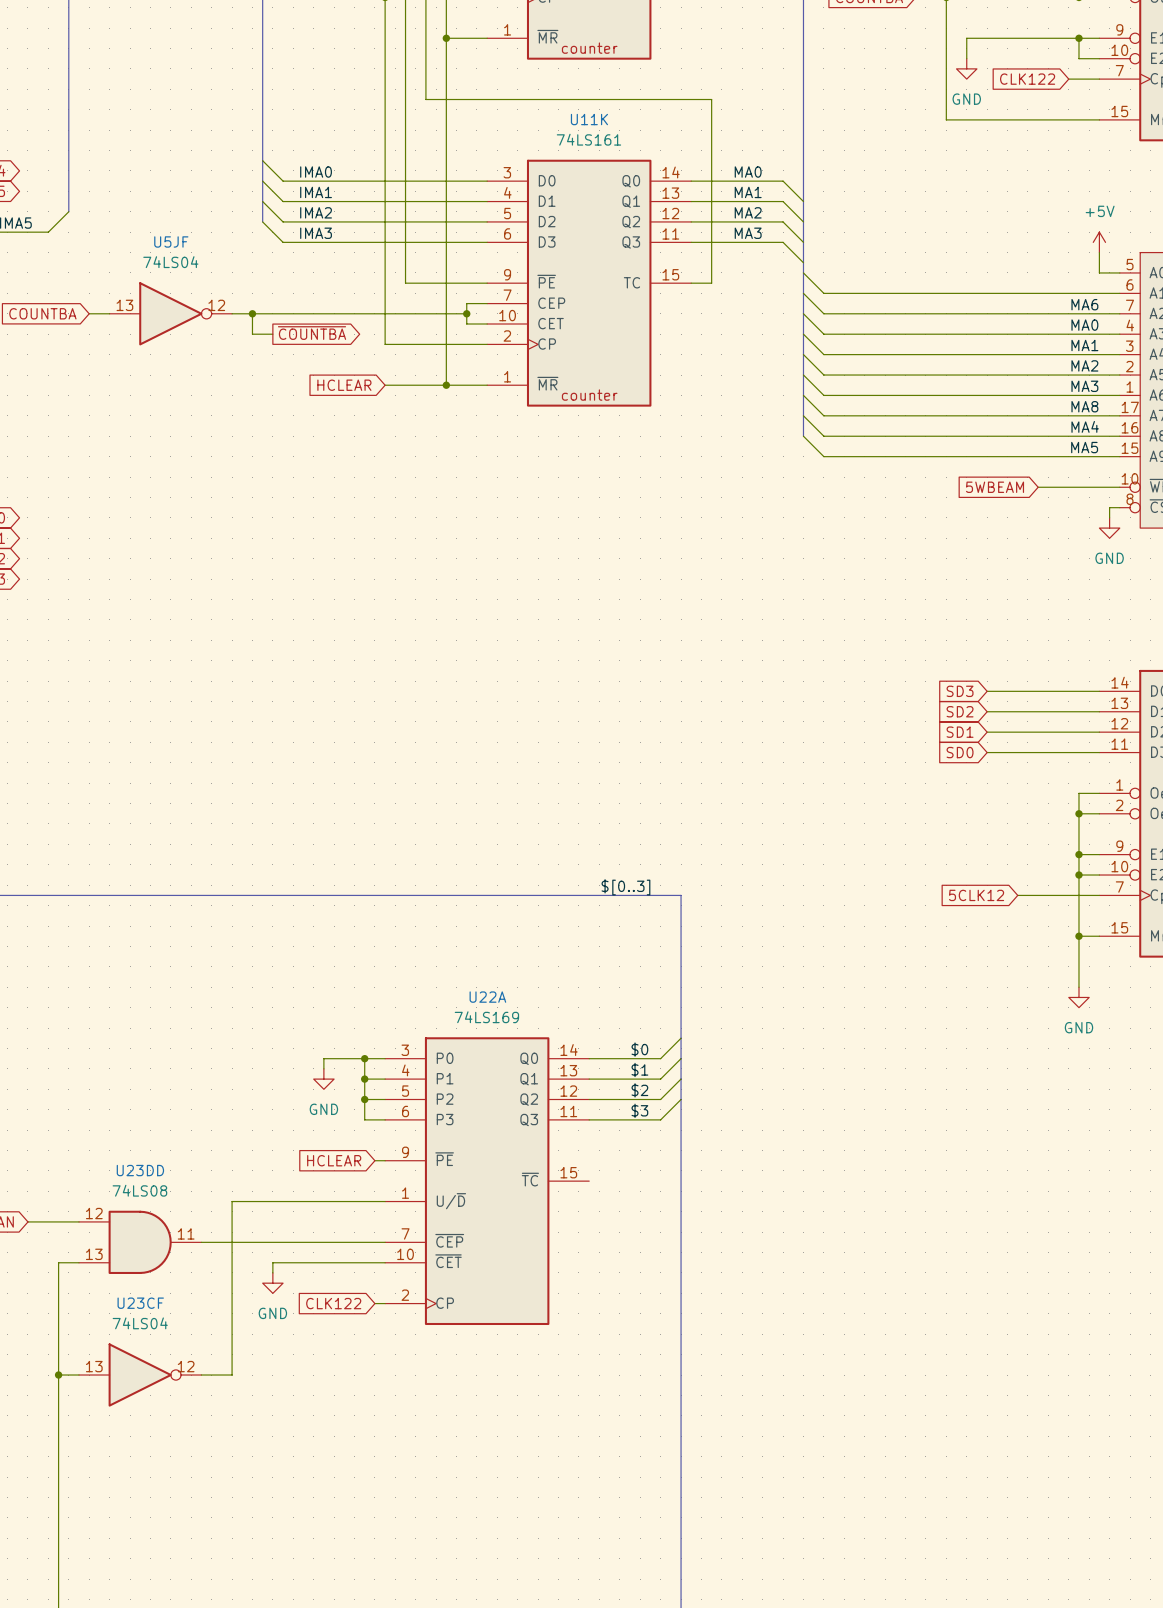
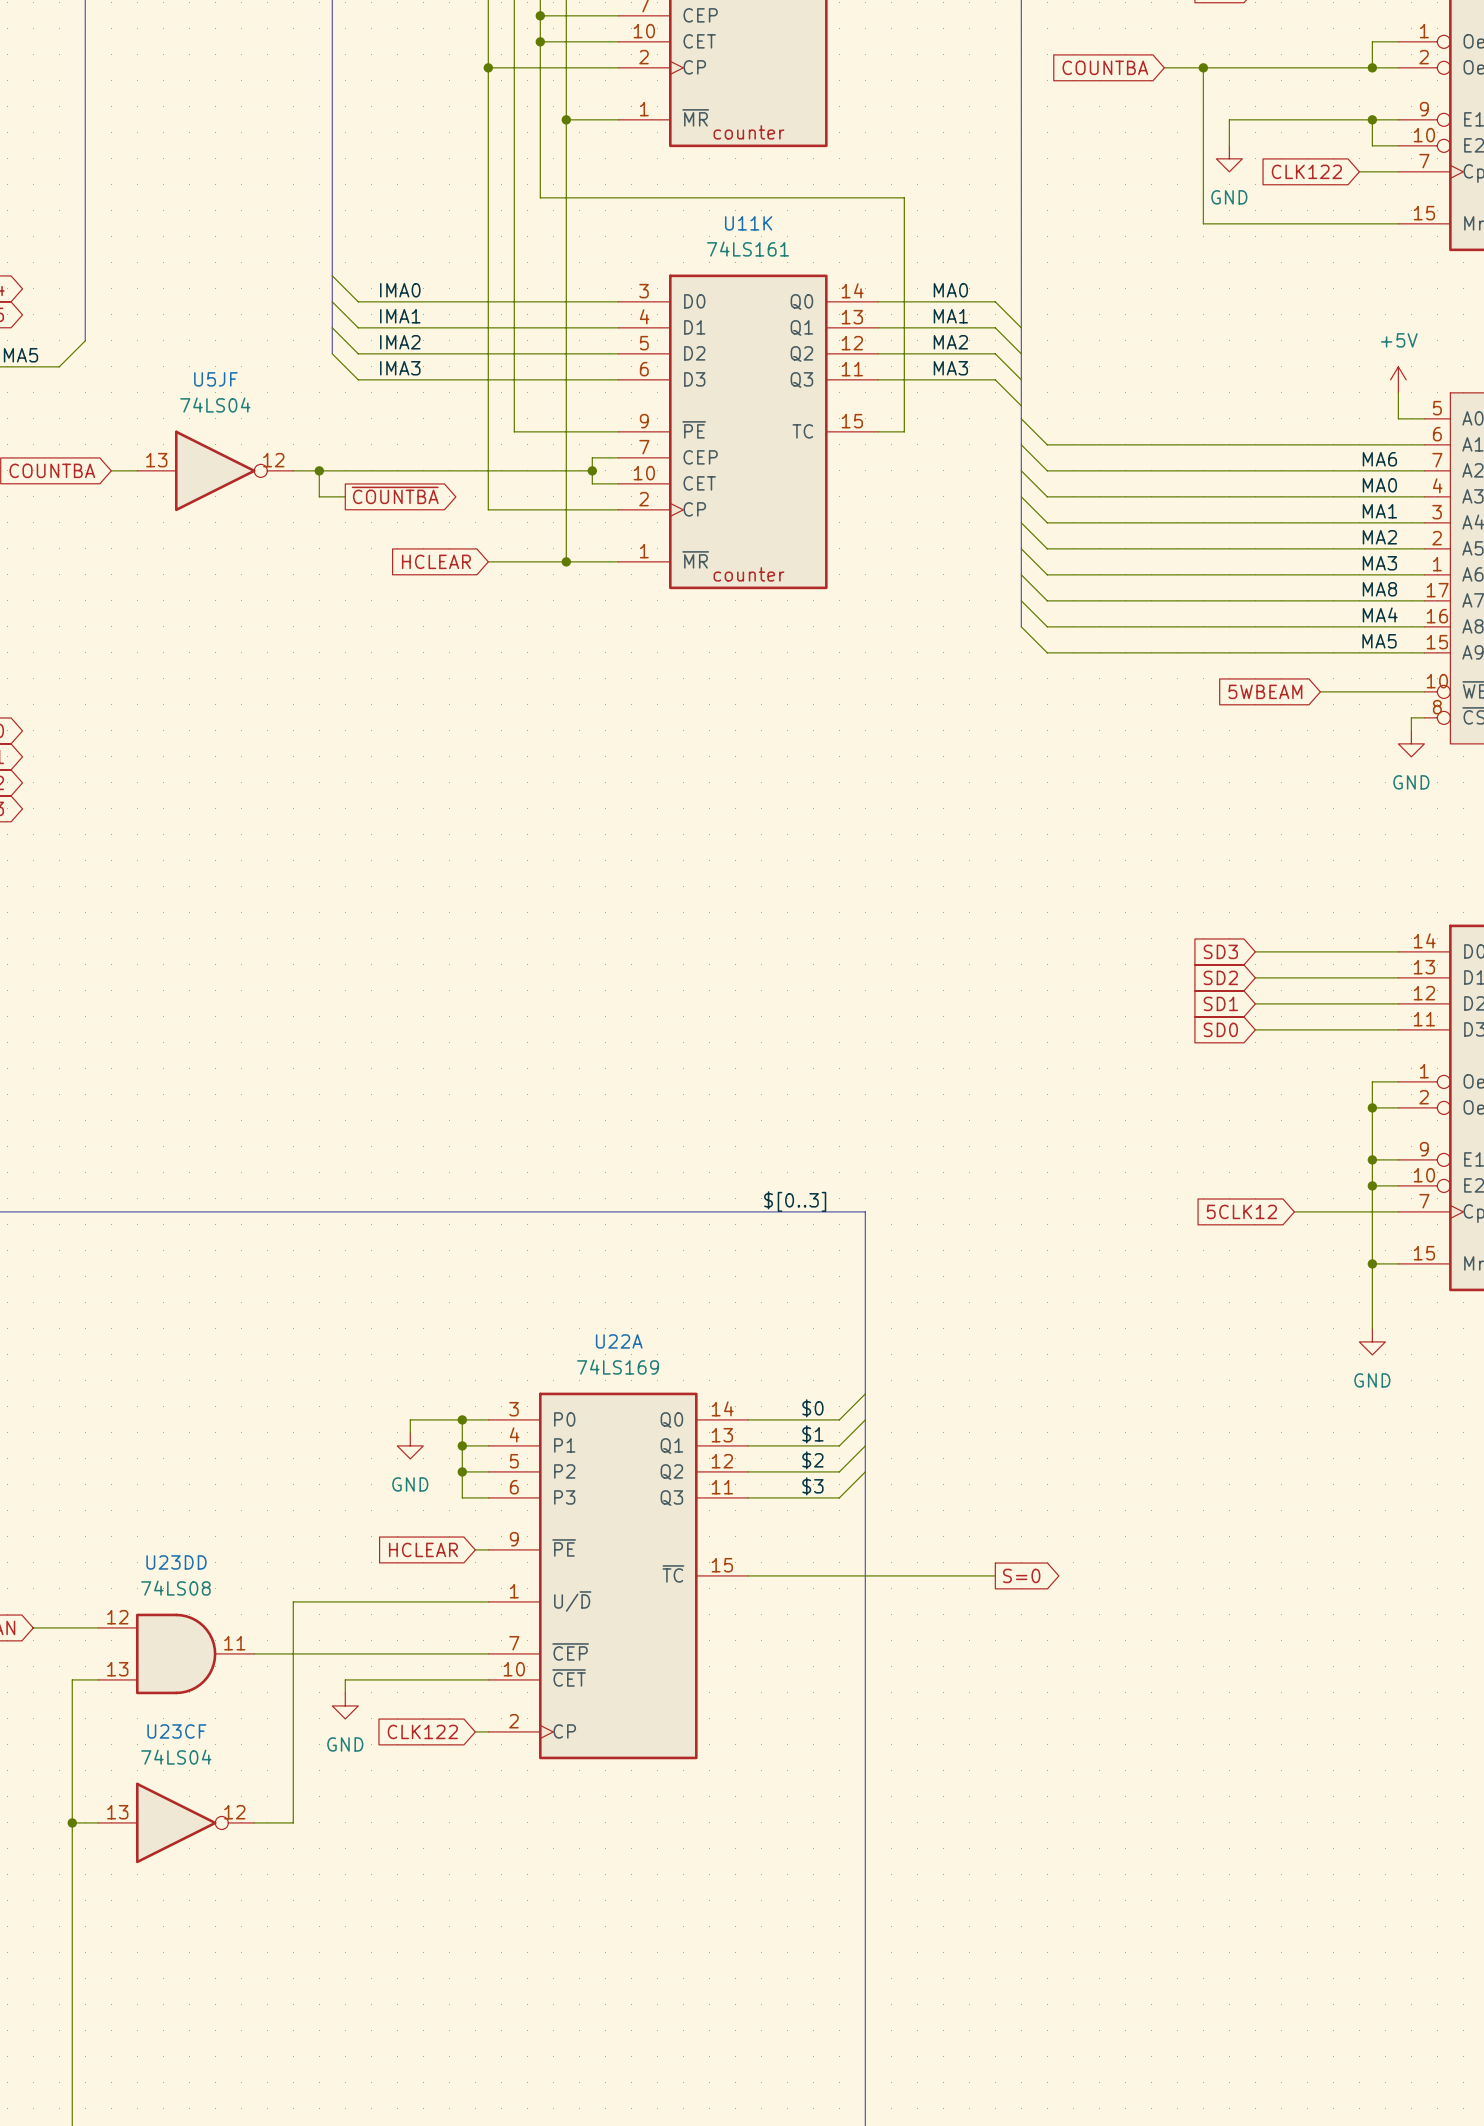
wire: none -> (748, 1575) (995, 1575)
global label: none -> S=0 (1021, 1575)

